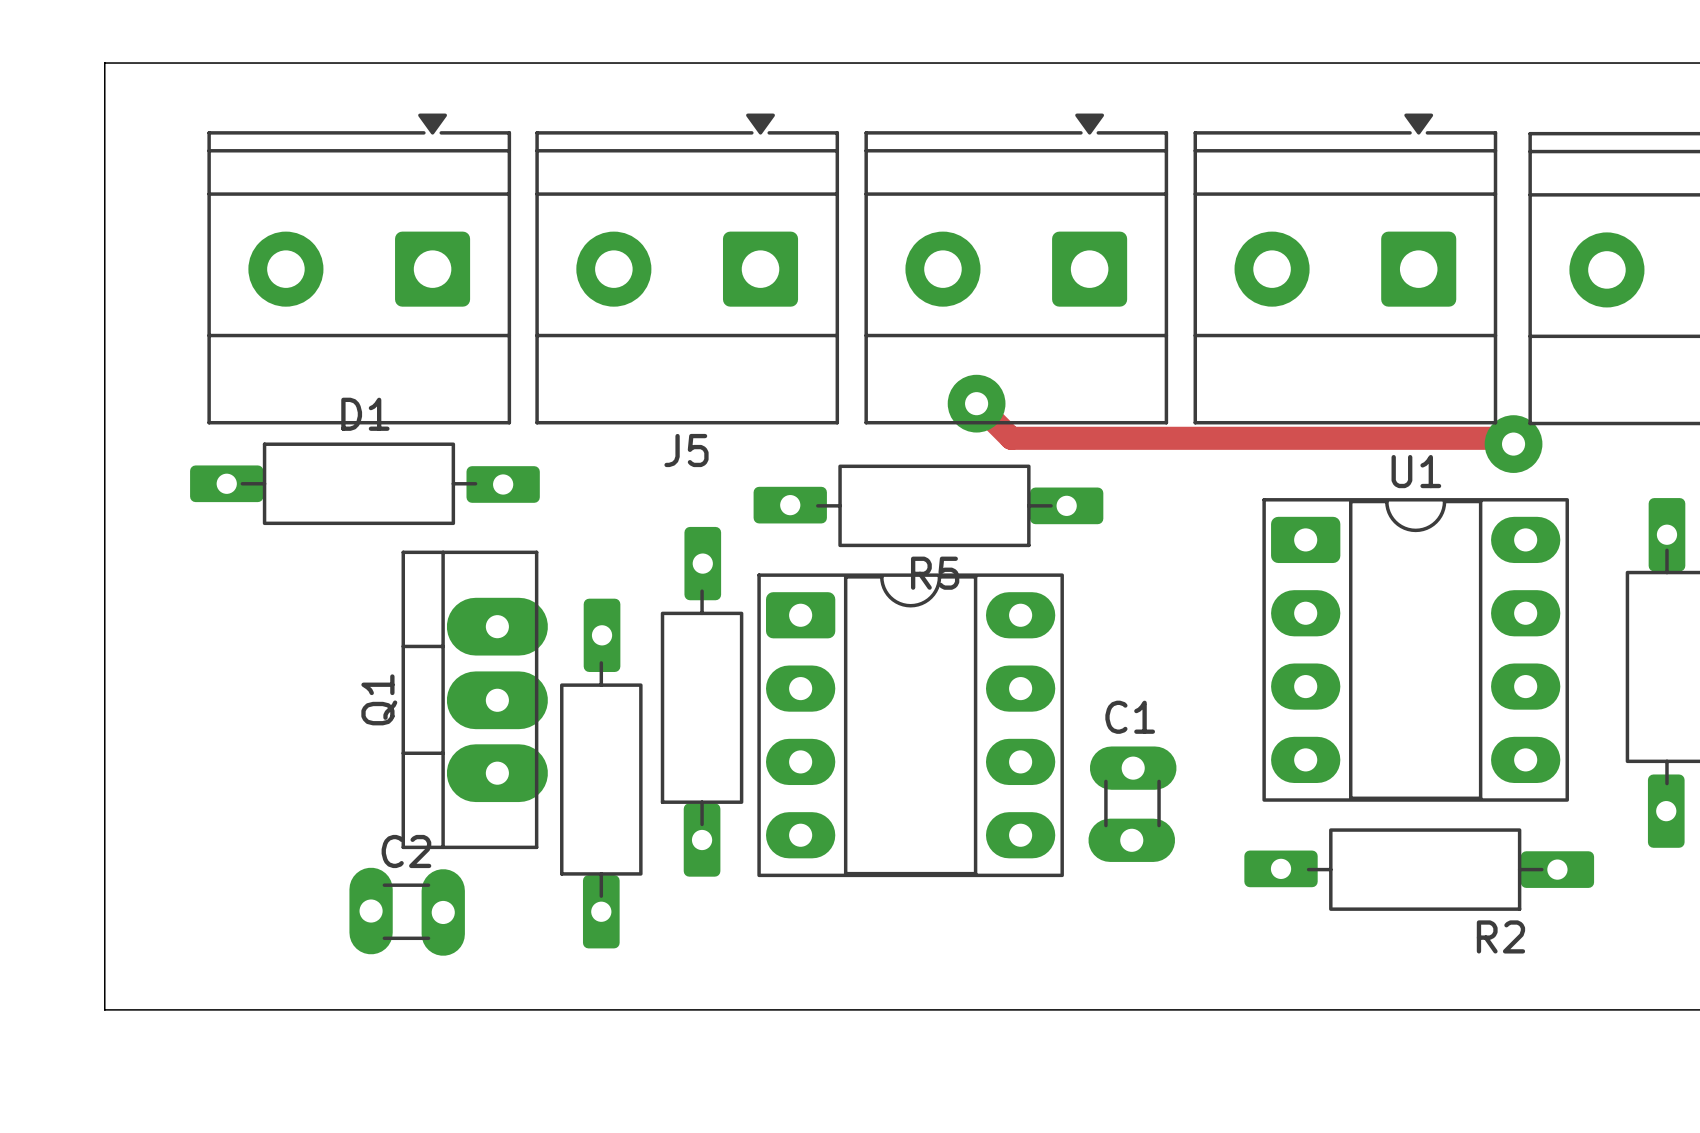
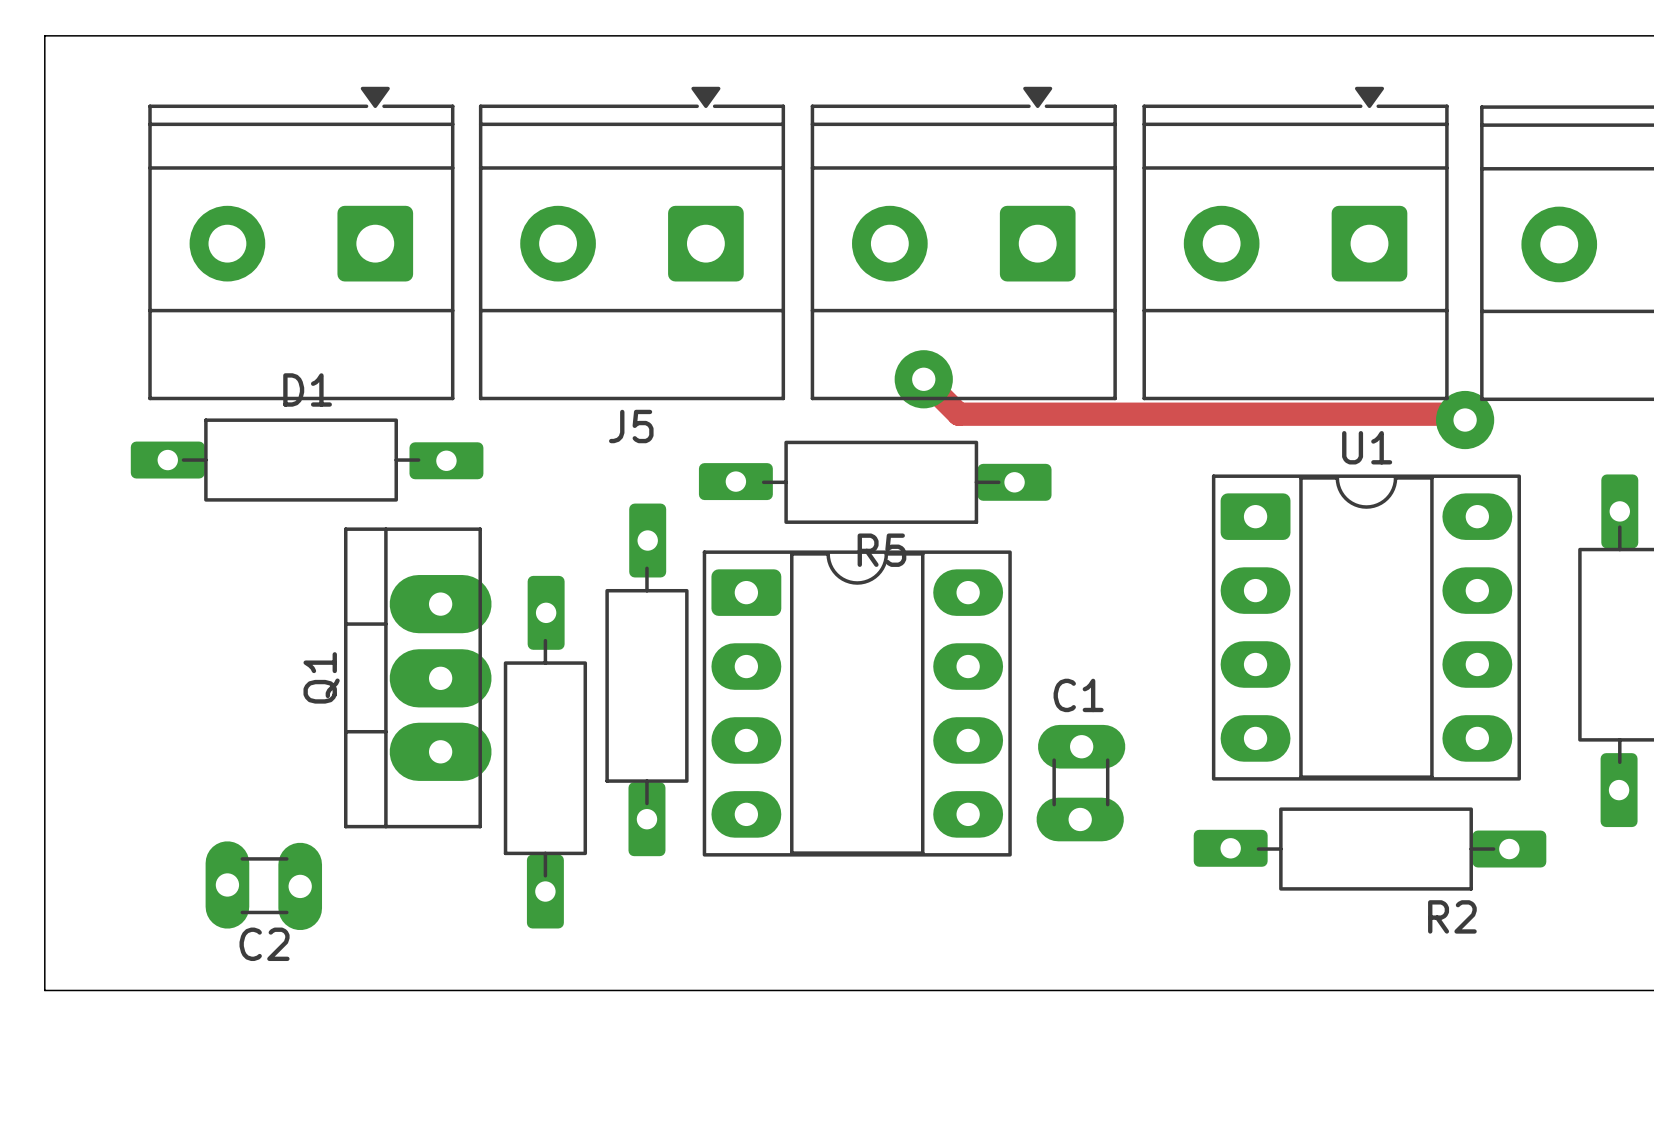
C2 rotation: 0° (407, 911) -> 180° (263, 885)
C2 position: (407, 911) -> (263, 885)

